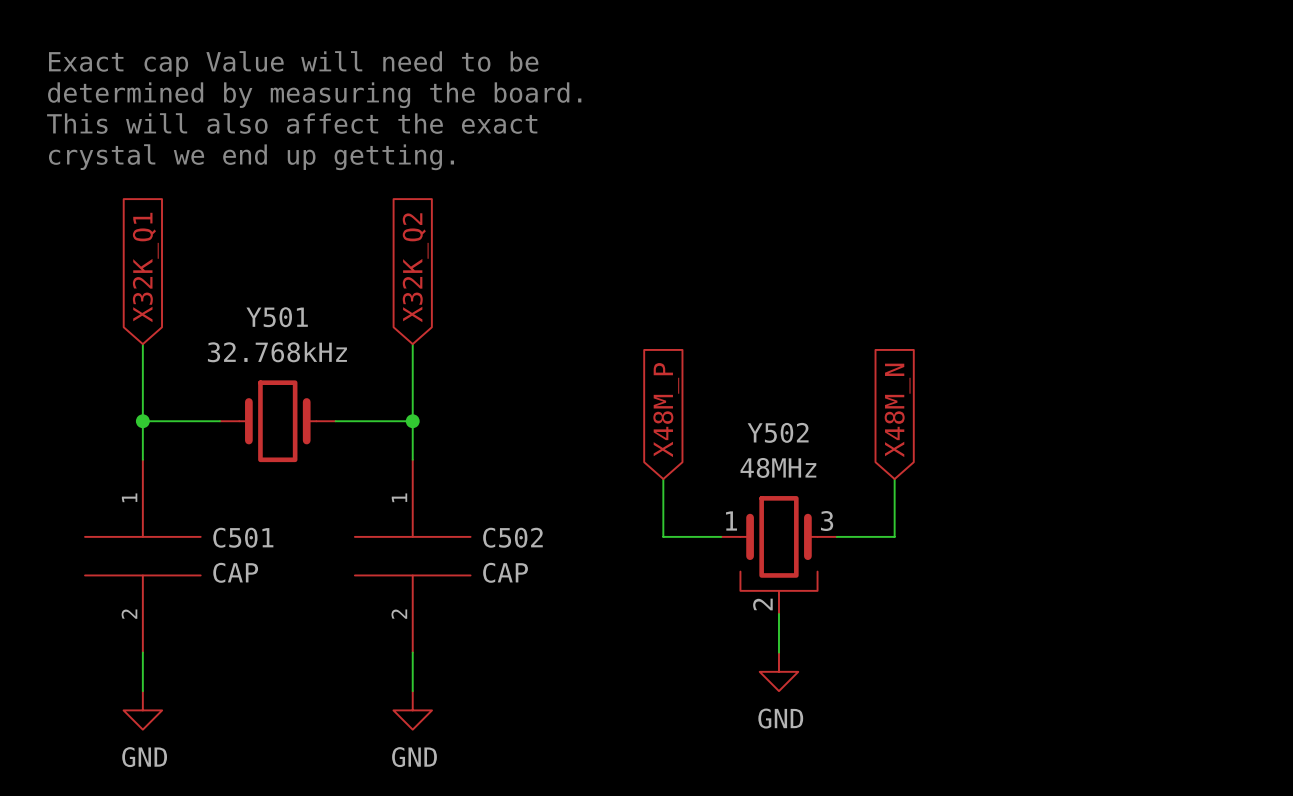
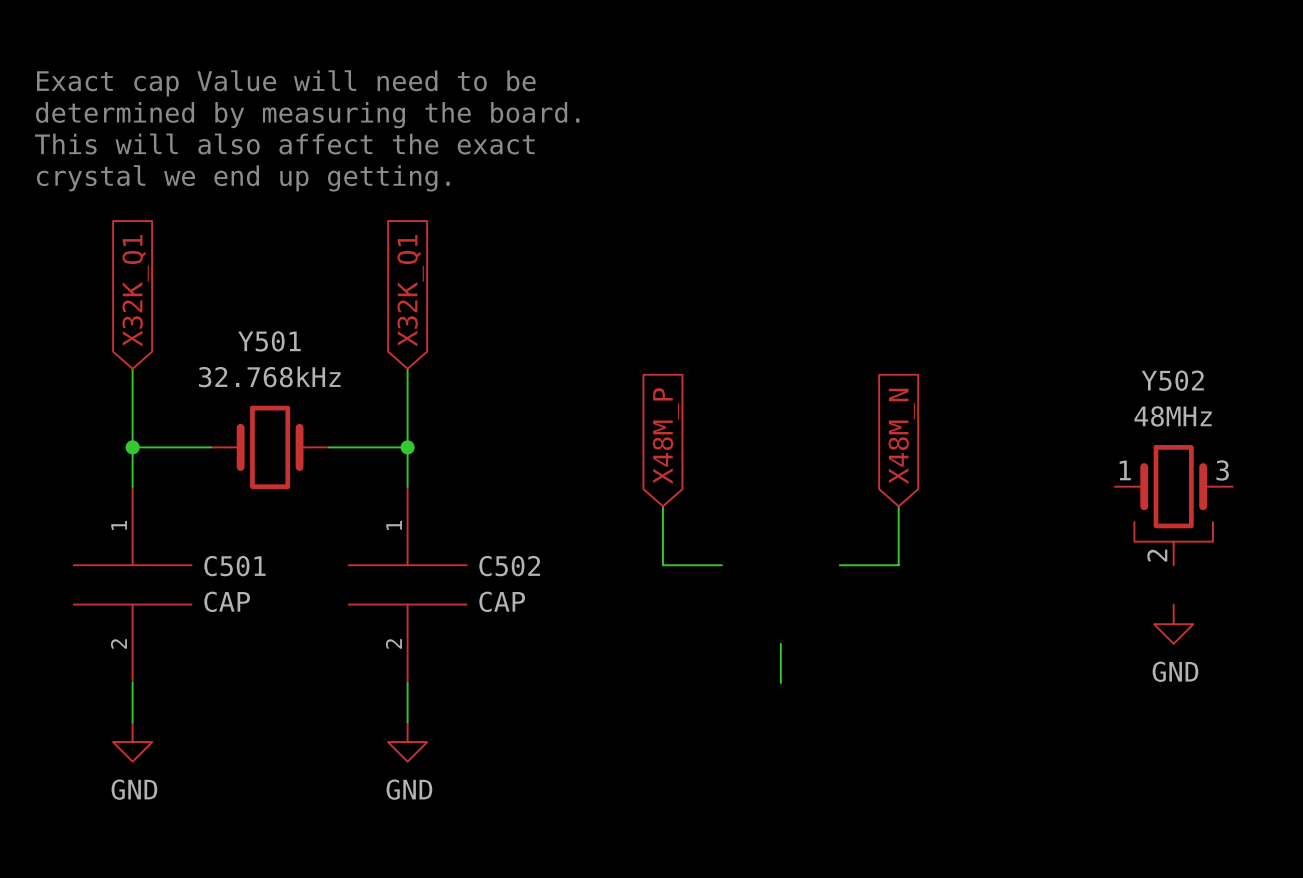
global label: X32K_Q2 (415, 267) -> X32K_Q1 (410, 290)
Y502 position: (778, 555) -> (1173, 505)
power symbol: none -> GND (1173, 624)
power symbol: GND (778, 671) -> none

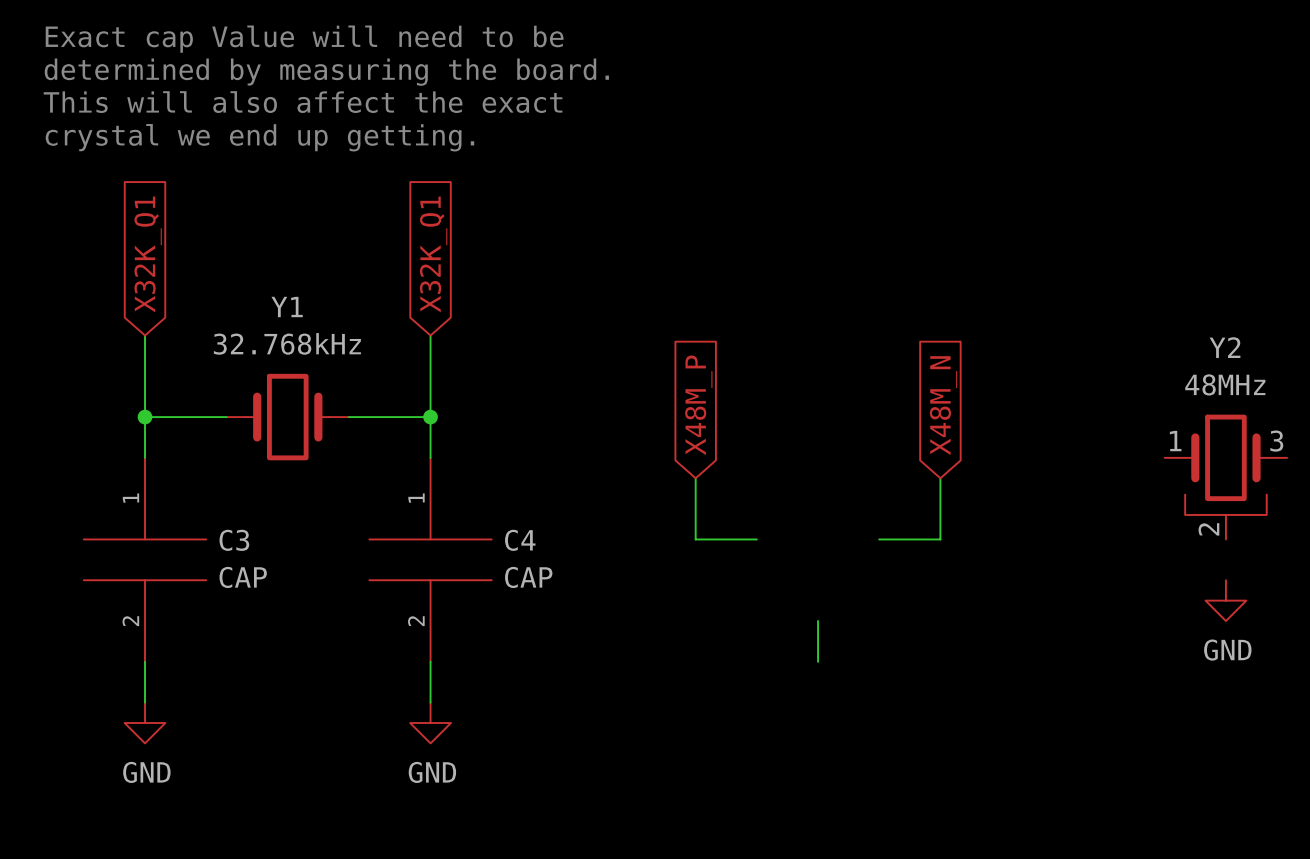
Y501 name: Y501 (269, 341) -> Y1 (287, 307)
Y502 name: Y502 (1172, 380) -> Y2 (1225, 347)
C501 name: C501 (234, 566) -> C3 (234, 540)
C502 name: C502 (509, 566) -> C4 (520, 540)

